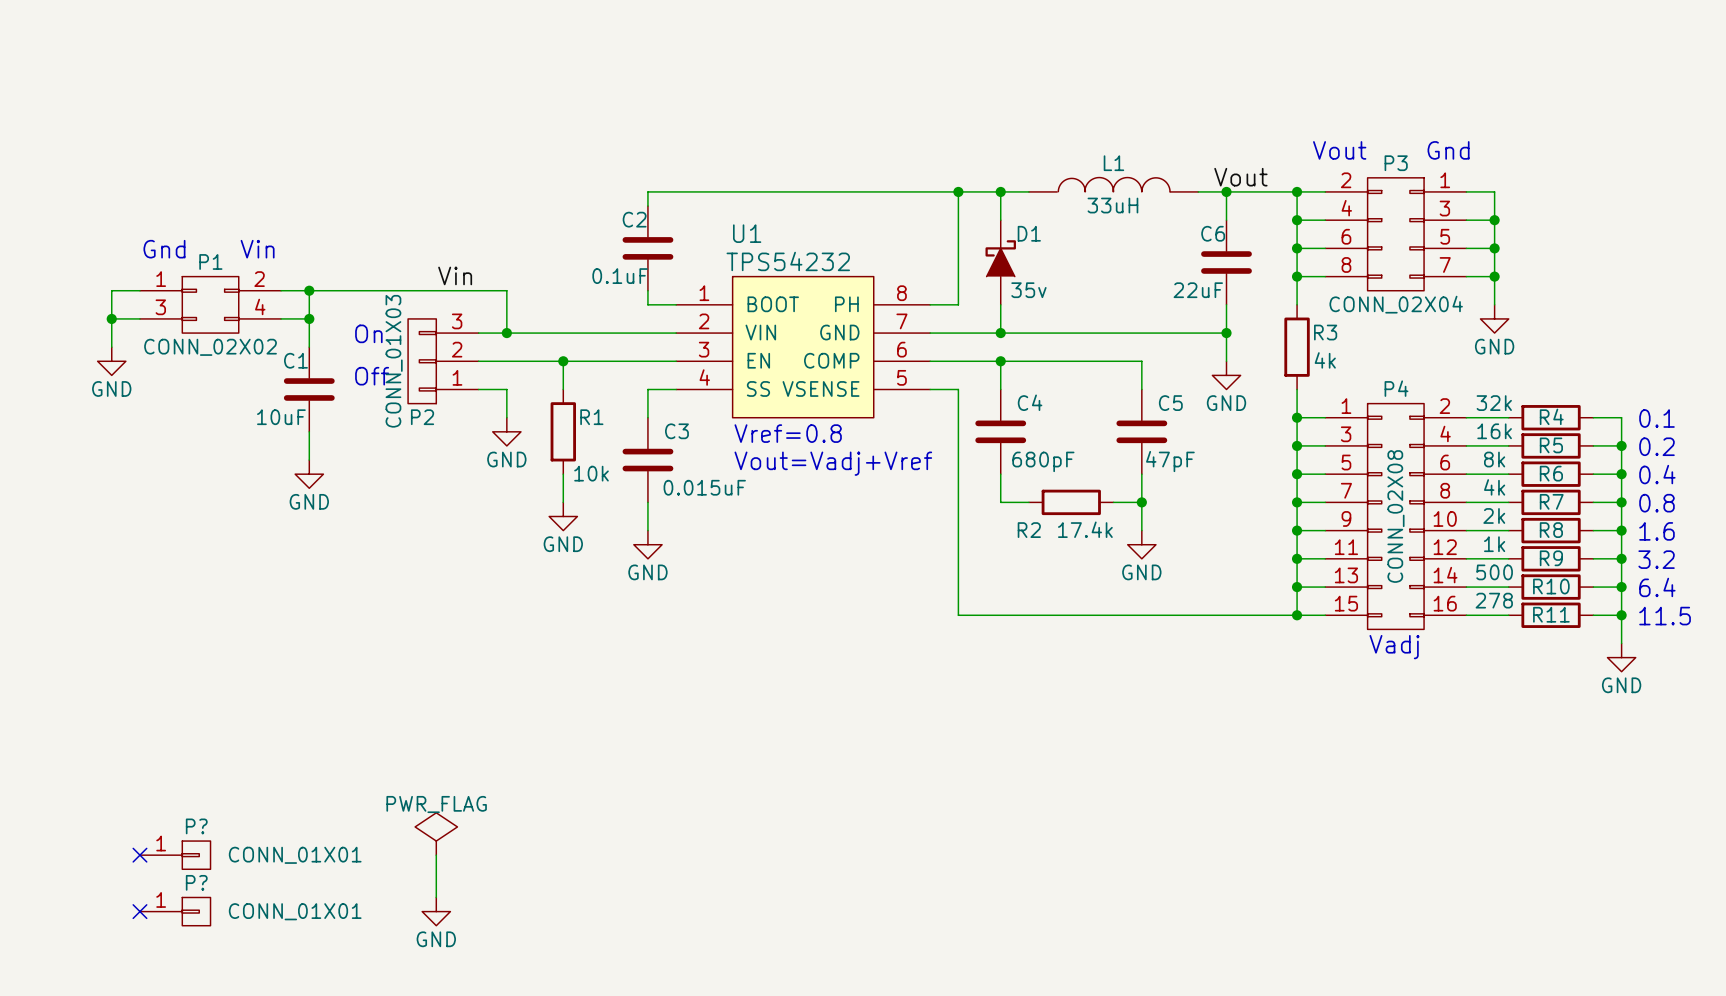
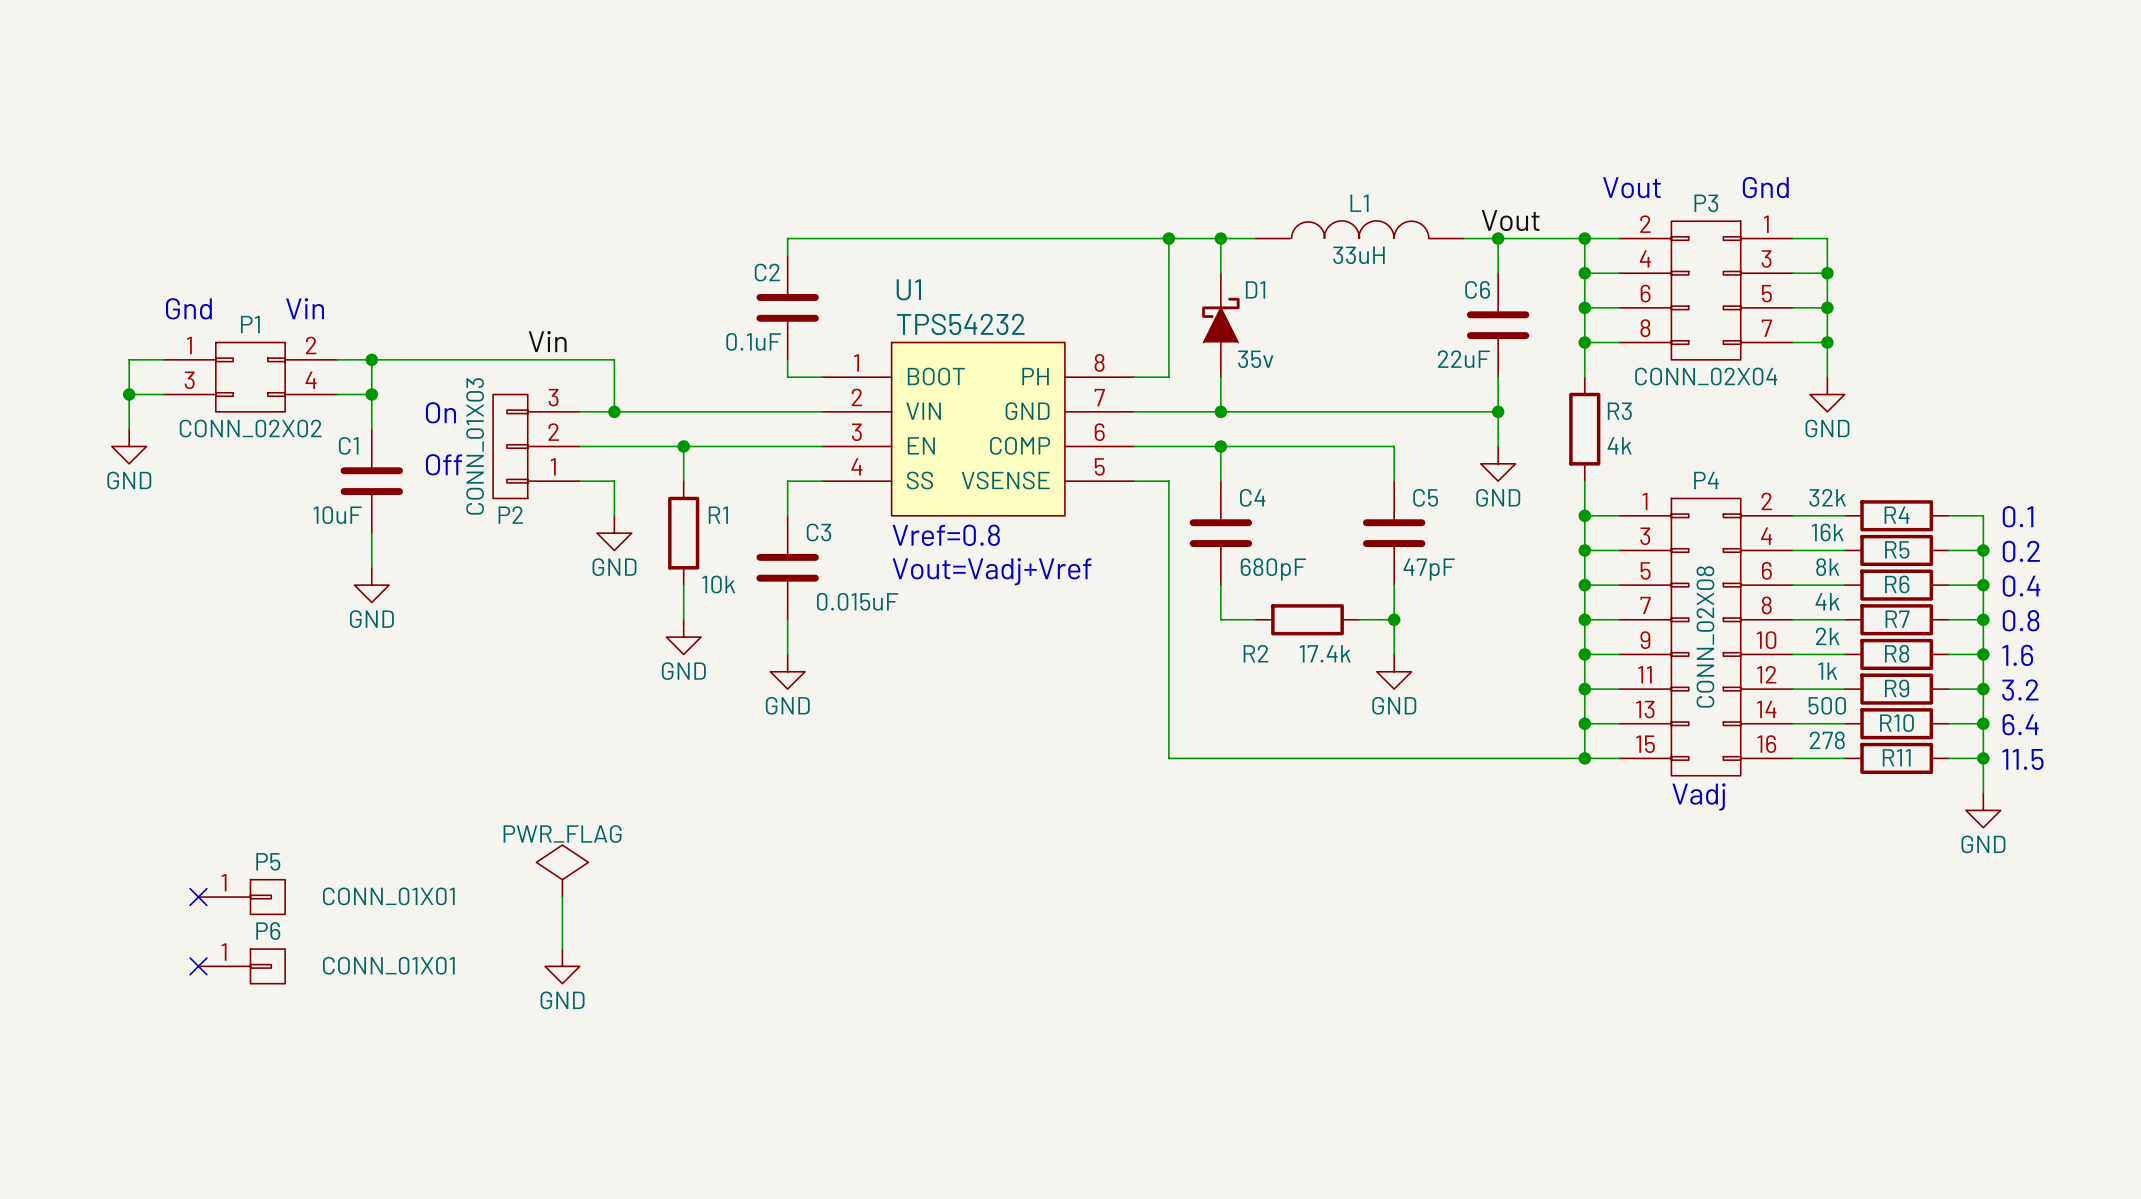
no-connect mark: none -> (198, 897)
P5: none -> CONN_01X01 (241, 897)
no-connect mark: none -> (198, 966)
P6: none -> CONN_01X01 (241, 966)
power symbol position: PWR_FLAG (436, 833) -> PWR_FLAG (562, 871)
no-connect mark: (139, 855) -> none
P?: CONN_01X01 (175, 855) -> none
wire: (436, 855) (436, 897) -> (562, 897) (562, 949)
no-connect mark: (139, 911) -> none
P?: CONN_01X01 (175, 911) -> none
power symbol position: GND (436, 911) -> GND (562, 966)

